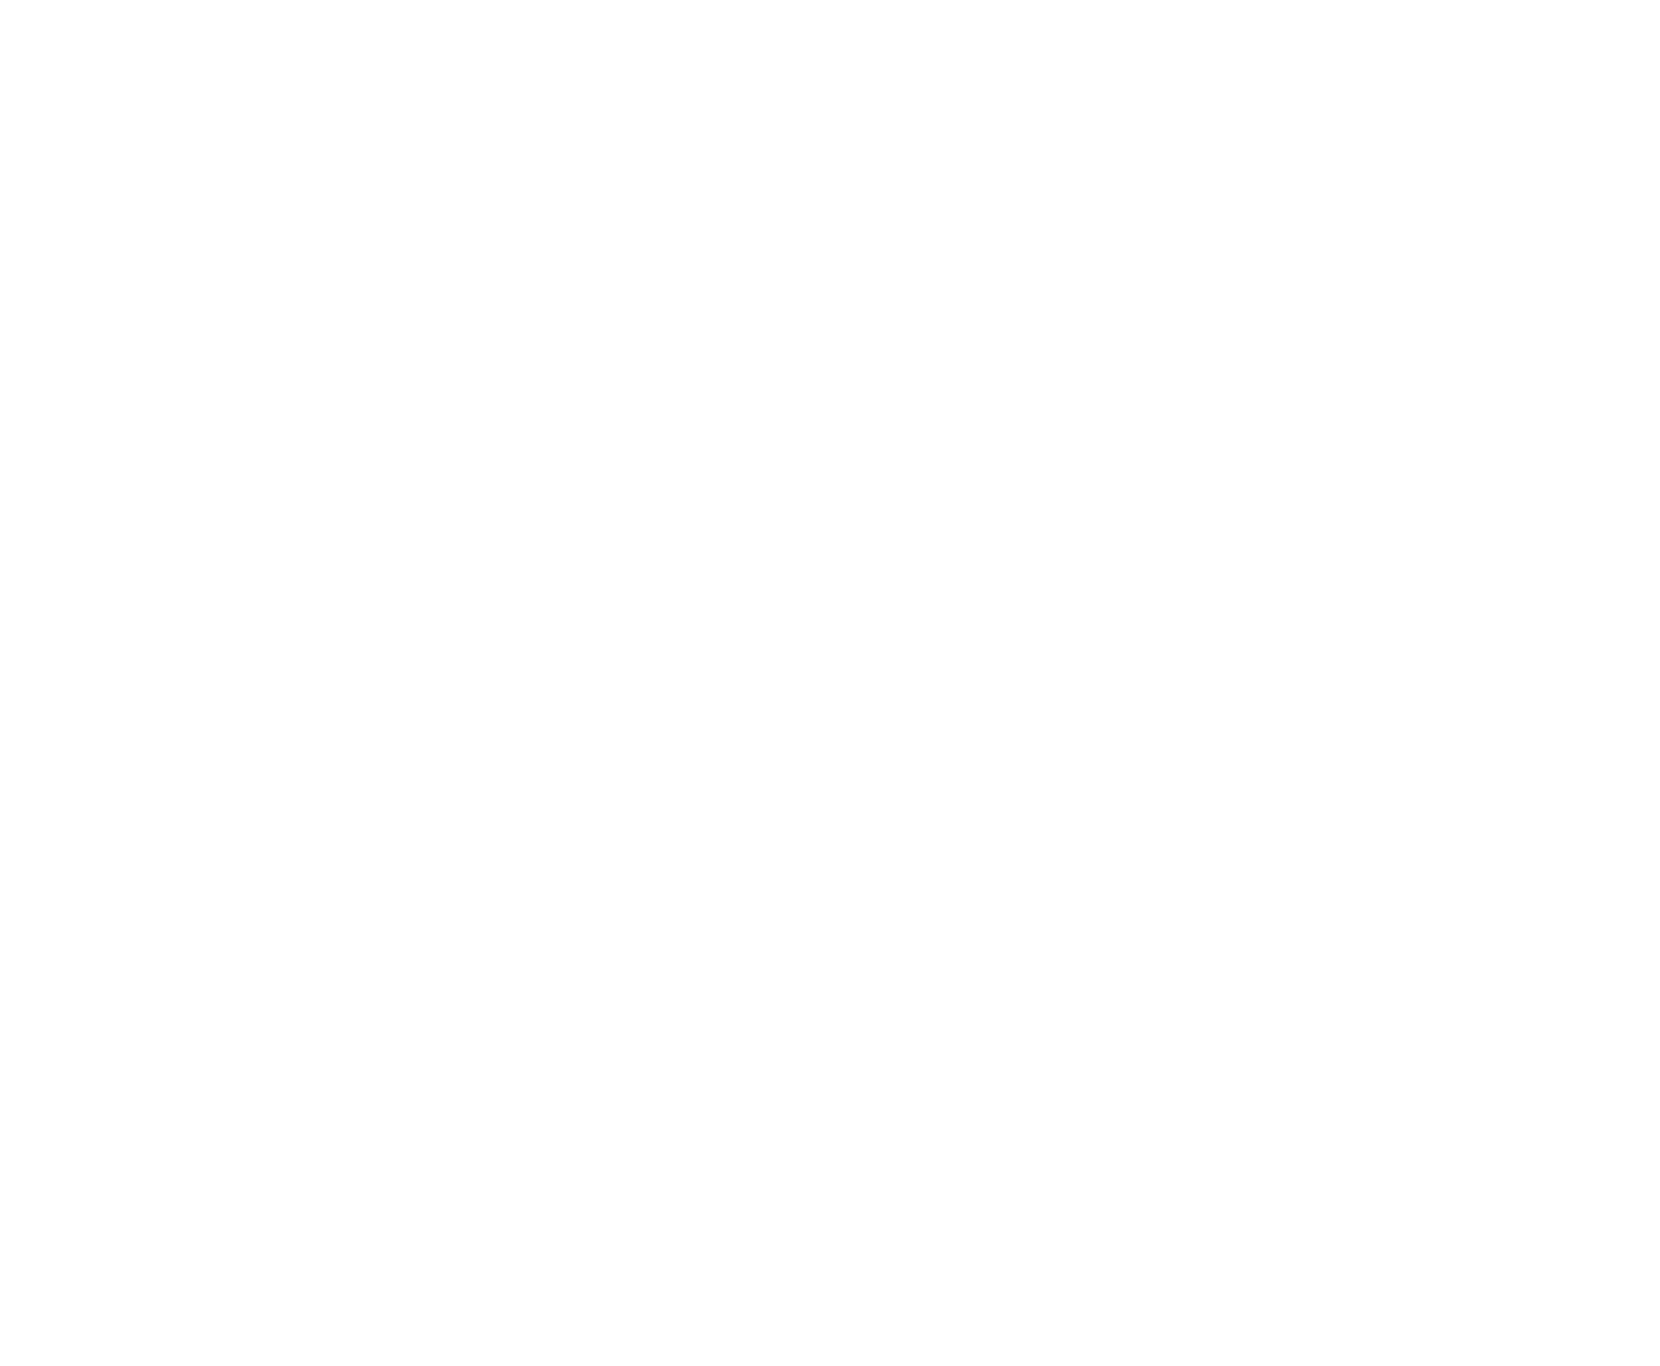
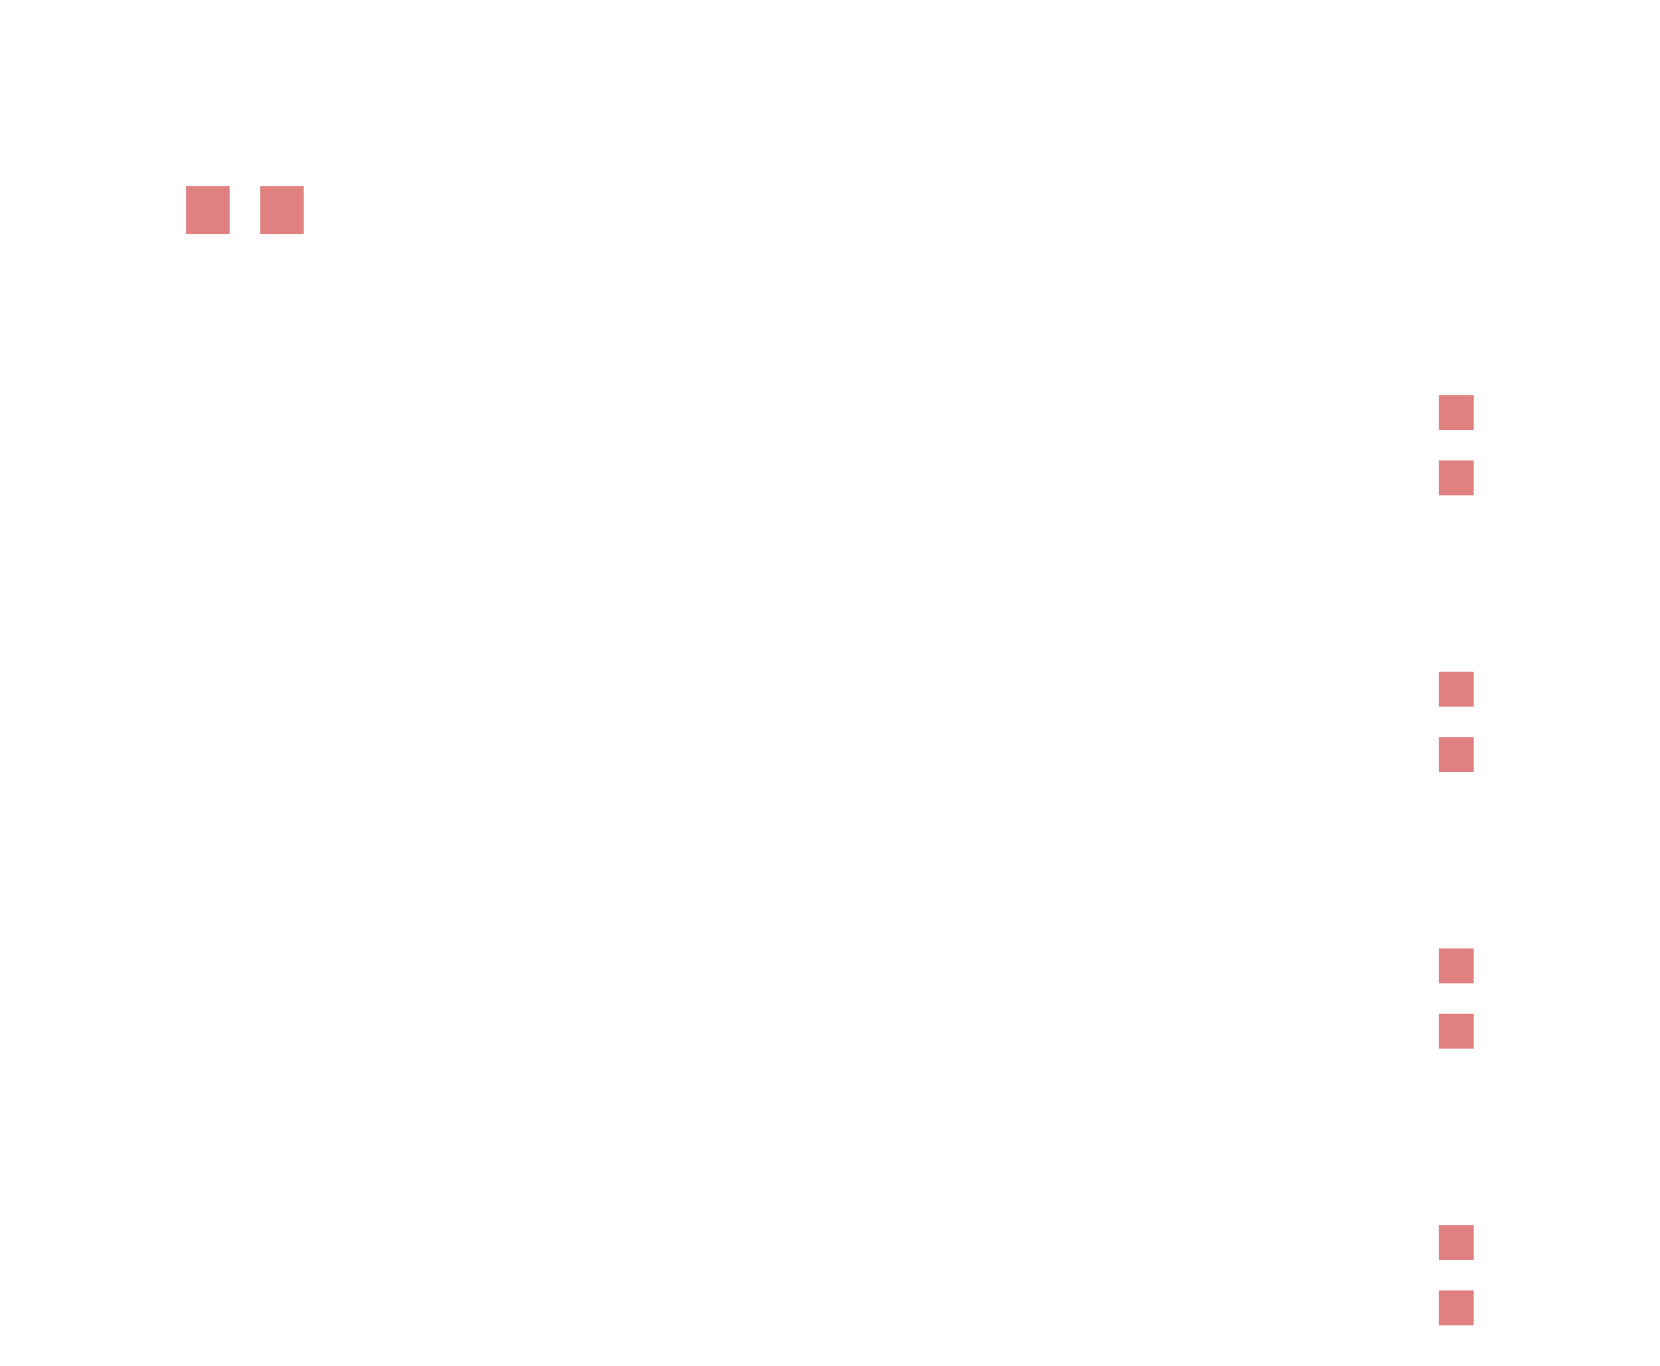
part: none -> (244, 210)
part: none -> (1456, 445)
part: none -> (1456, 721)
part: none -> (1456, 998)
part: none -> (1456, 1275)

